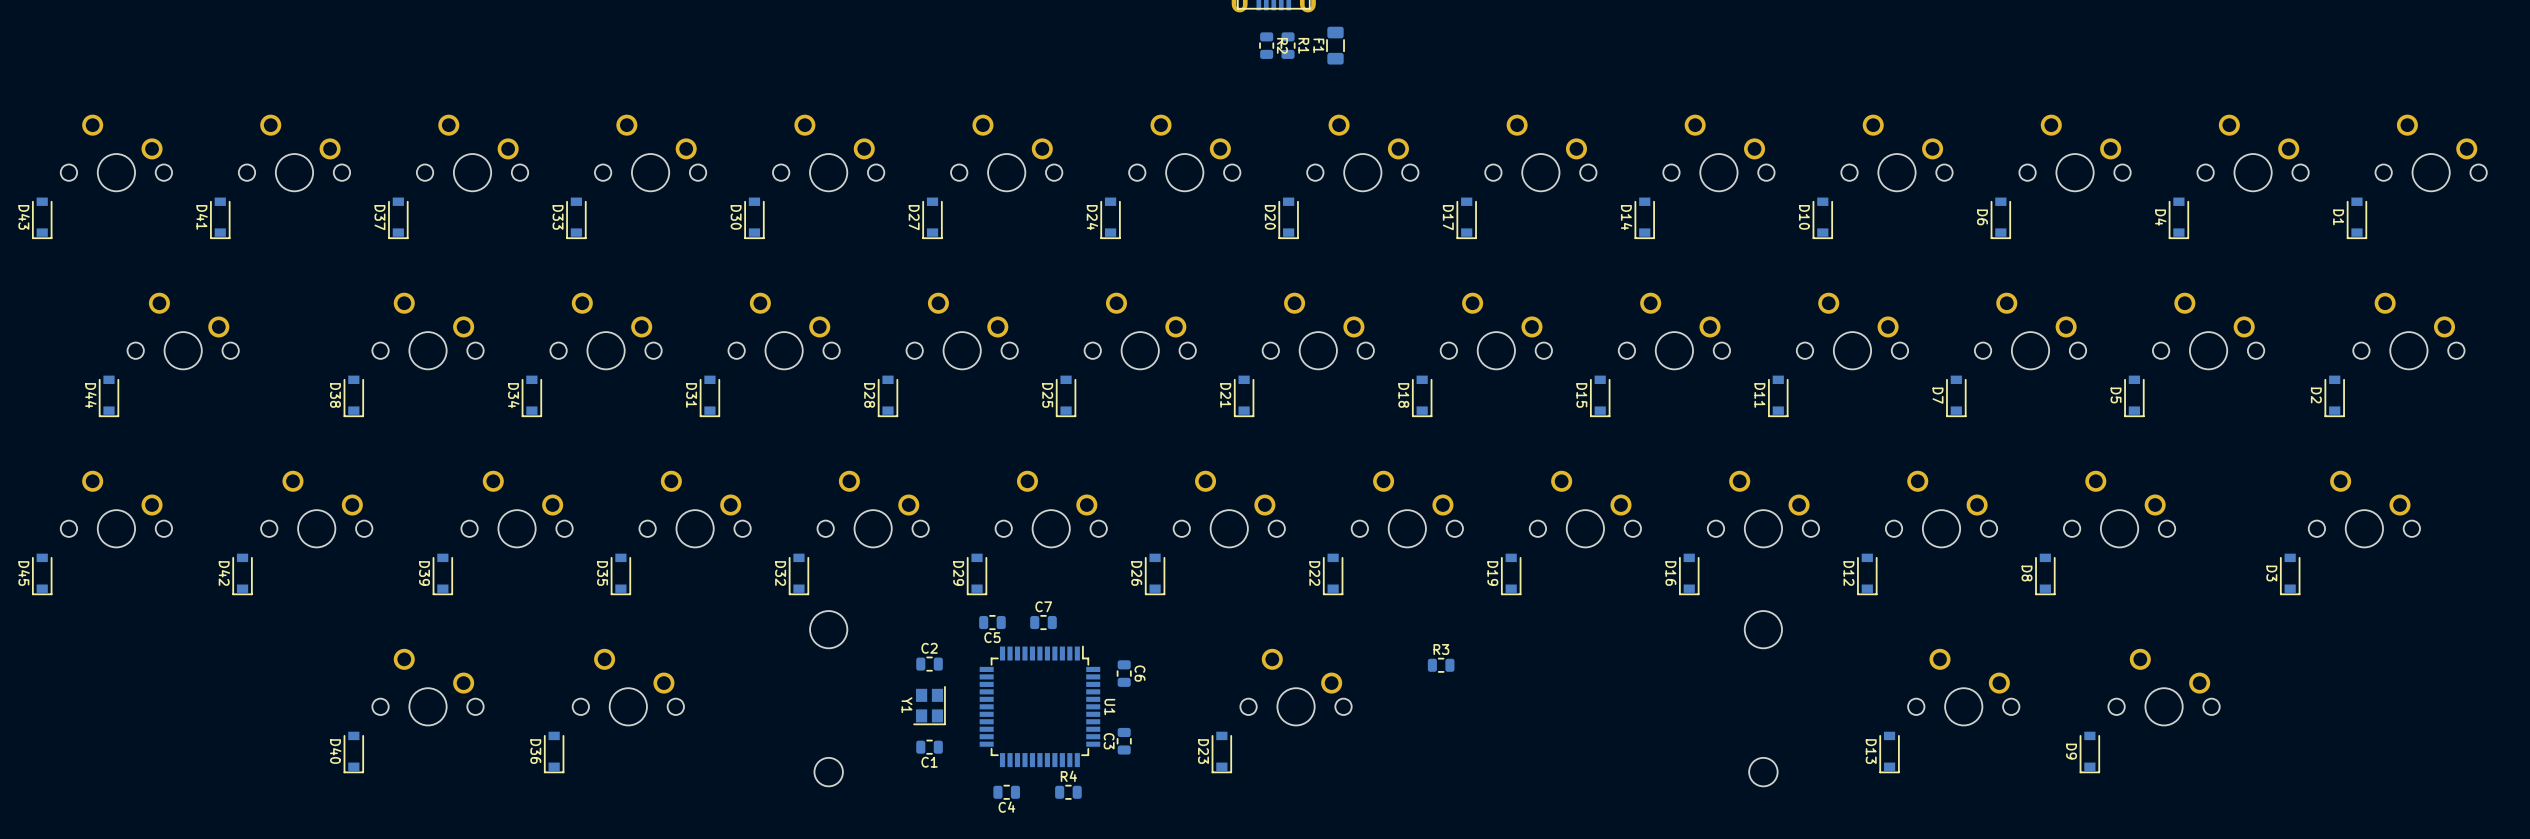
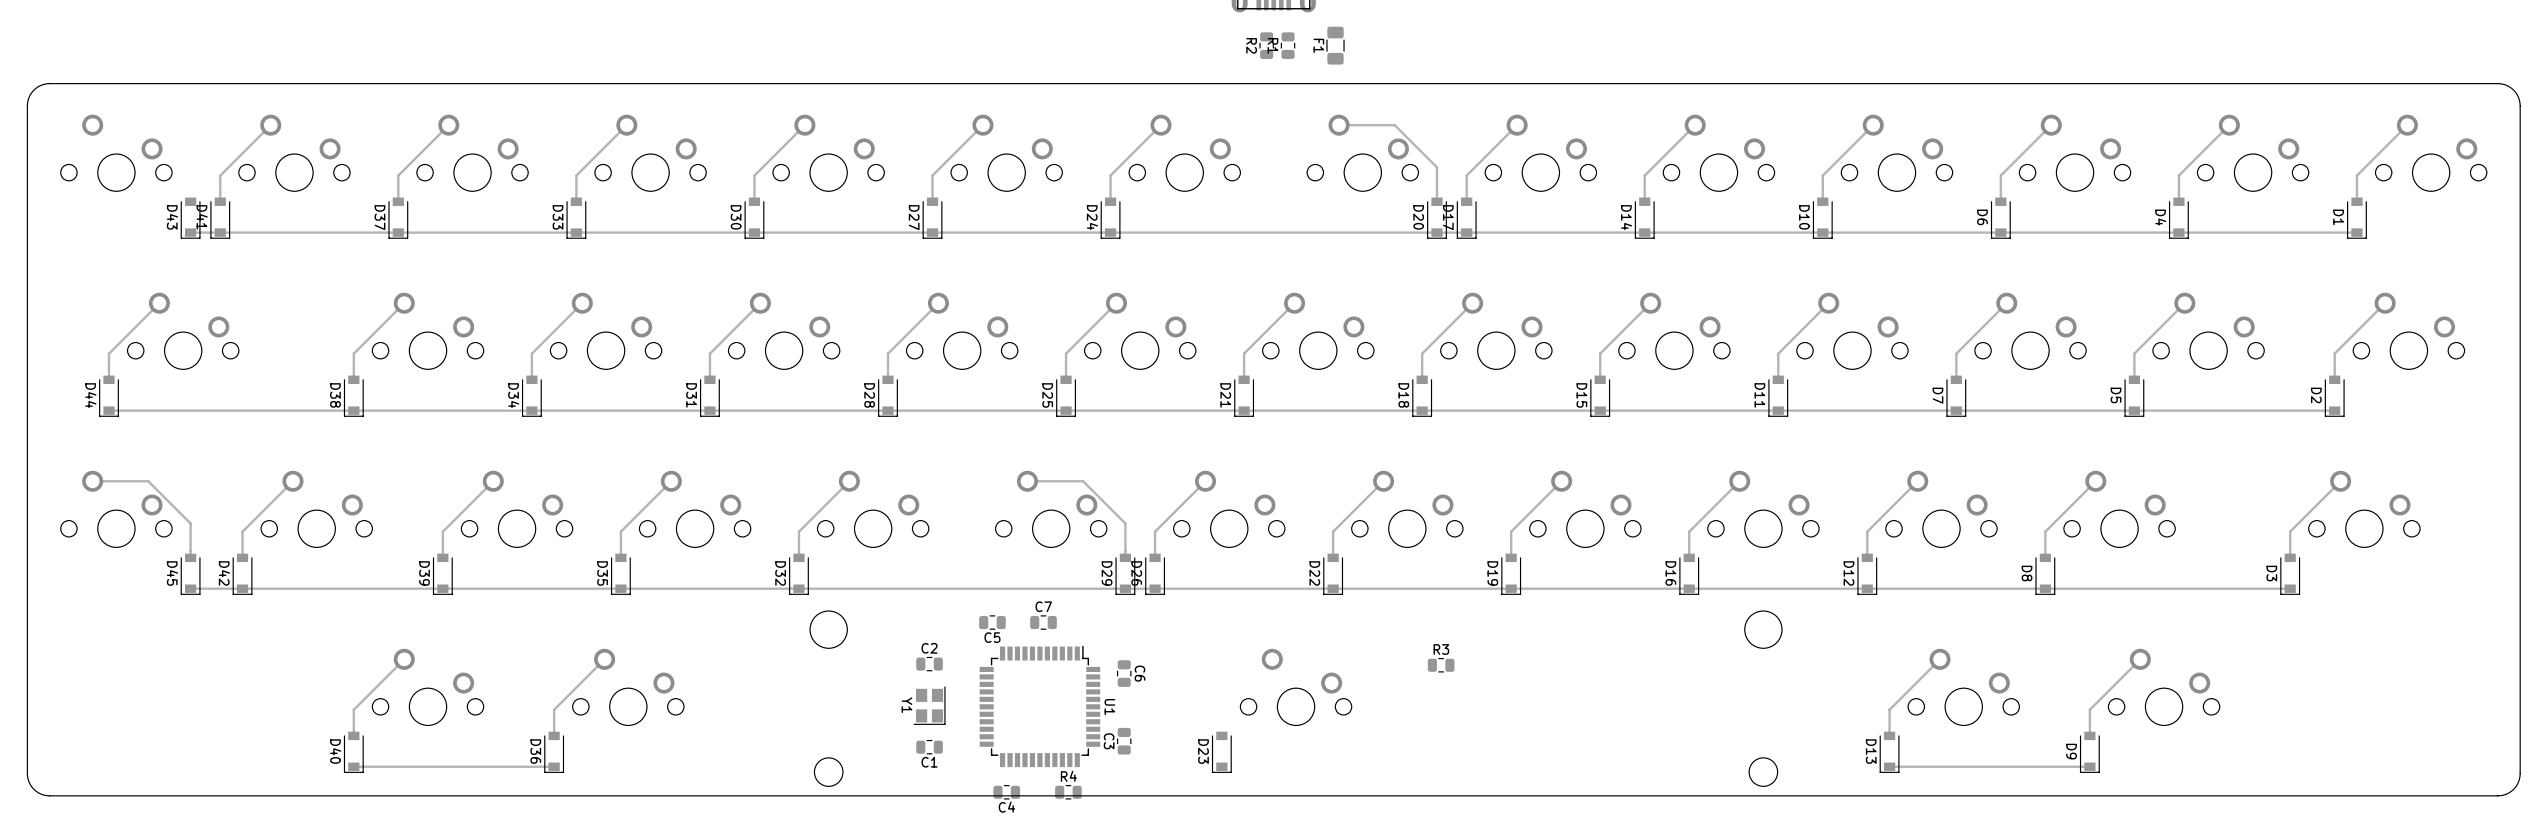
R2 name position: R2 (1282, 45) -> R2 (1251, 45)
R1 name position: R1 (1303, 45) -> R1 (1272, 45)
board edge: none -> (2497, 83) (43, 84) (31, 92) (27, 105) (28, 779) (36, 791) (49, 795) (2503, 795) (2515, 787) (2520, 773) (2520, 105) (2518, 97) (2513, 90) (2506, 85) (2497, 83)
track: none -> (270, 125) (220, 175) (220, 201)
track: none -> (448, 125) (398, 175) (398, 201)
track: none -> (626, 125) (576, 175) (576, 201)
track: none -> (804, 125) (754, 175) (754, 201)
track: none -> (982, 125) (932, 175) (932, 201)
track: none -> (1161, 125) (1110, 175) (1110, 201)
track: none -> (1339, 125) (1394, 125) (1437, 167) (1437, 201)
track: none -> (1517, 125) (1466, 175) (1466, 201)
track: none -> (1695, 125) (1644, 175) (1644, 201)
track: none -> (1873, 125) (1822, 175) (1822, 201)
track: none -> (2051, 125) (2000, 175) (2000, 201)
track: none -> (2229, 125) (2178, 175) (2178, 201)
track: none -> (2407, 125) (2356, 175) (2356, 201)
D43 position: (42, 218) -> (190, 218)
D20 position: (1288, 218) -> (1437, 218)
track: none -> (2356, 232) (190, 232)
track: none -> (159, 303) (109, 353) (109, 379)
track: none -> (404, 303) (353, 353) (353, 379)
track: none -> (582, 303) (531, 353) (531, 379)
track: none -> (760, 303) (709, 353) (709, 379)
track: none -> (938, 303) (887, 353) (887, 379)
track: none -> (1116, 303) (1066, 353) (1066, 379)
track: none -> (1294, 303) (1244, 353) (1244, 379)
track: none -> (1472, 303) (1422, 353) (1422, 379)
track: none -> (1650, 303) (1600, 353) (1600, 379)
track: none -> (1828, 303) (1778, 353) (1778, 379)
track: none -> (2006, 303) (1956, 353) (1956, 379)
track: none -> (2184, 303) (2134, 353) (2134, 379)
track: none -> (2385, 303) (2334, 353) (2334, 379)
track: none -> (2334, 410) (109, 410)
track: none -> (92, 481) (148, 481) (190, 523) (190, 557)
track: none -> (292, 481) (242, 531) (242, 557)
track: none -> (493, 481) (442, 531) (442, 557)
track: none -> (671, 481) (620, 531) (620, 557)
track: none -> (849, 481) (798, 531) (798, 557)
track: none -> (1027, 481) (1083, 481) (1125, 523) (1125, 557)
track: none -> (1205, 481) (1155, 531) (1155, 557)
track: none -> (1383, 481) (1333, 531) (1333, 557)
track: none -> (1561, 481) (1511, 531) (1511, 557)
track: none -> (1739, 481) (1689, 531) (1689, 557)
track: none -> (1917, 481) (1867, 531) (1867, 557)
track: none -> (2095, 481) (2045, 531) (2045, 557)
track: none -> (2340, 481) (2290, 531) (2290, 557)
D45 position: (42, 574) -> (190, 574)
D29 position: (977, 574) -> (1125, 574)
track: none -> (2290, 588) (190, 588)
track: none -> (404, 659) (353, 709) (353, 735)
track: none -> (604, 659) (554, 709) (554, 735)
track: none -> (1940, 659) (1889, 709) (1889, 735)
track: none -> (2140, 659) (2089, 709) (2089, 735)
track: none -> (554, 766) (353, 766)
track: none -> (2089, 766) (1889, 766)

